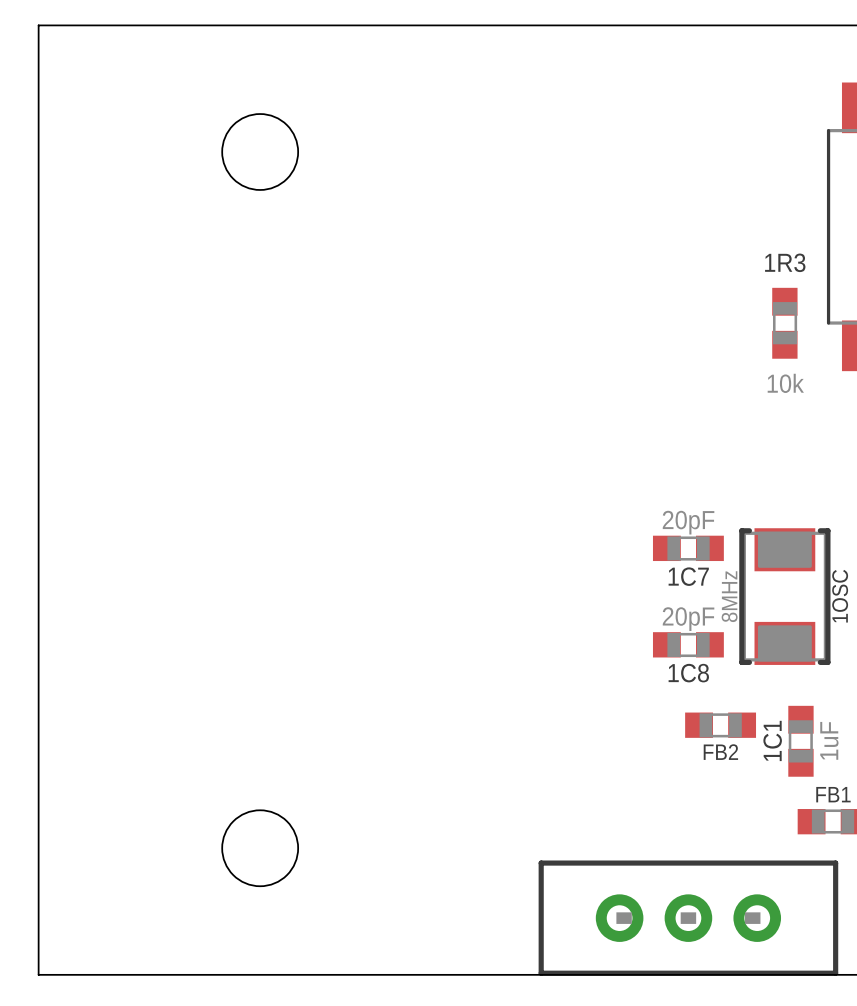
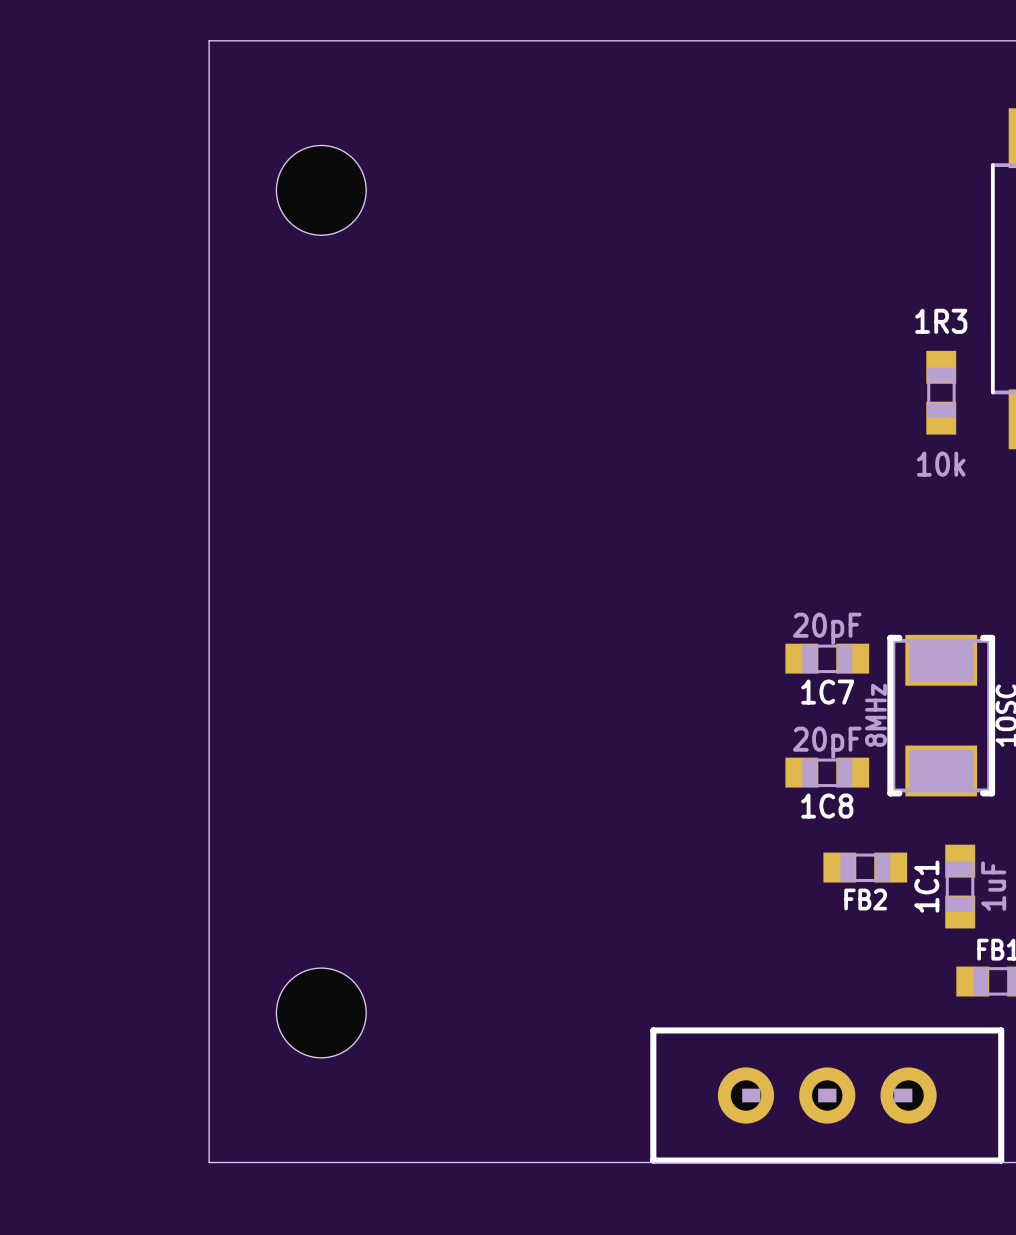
board edge: (165, 25) (38, 25) (38, 974) (165, 974) -> (209, 40) (209, 1162)

